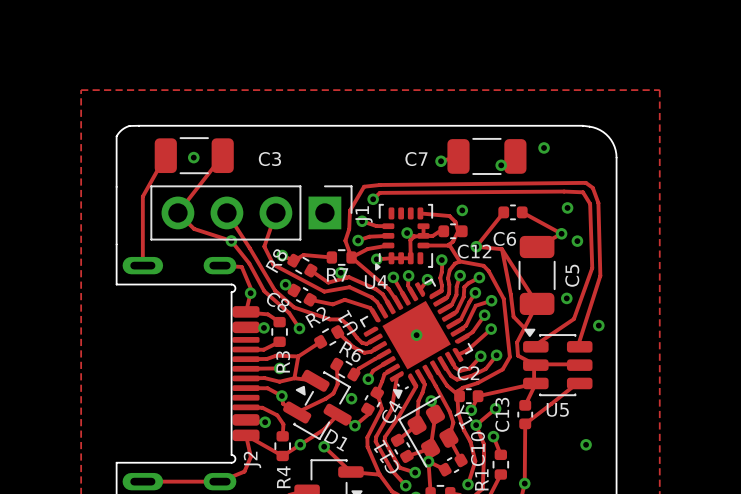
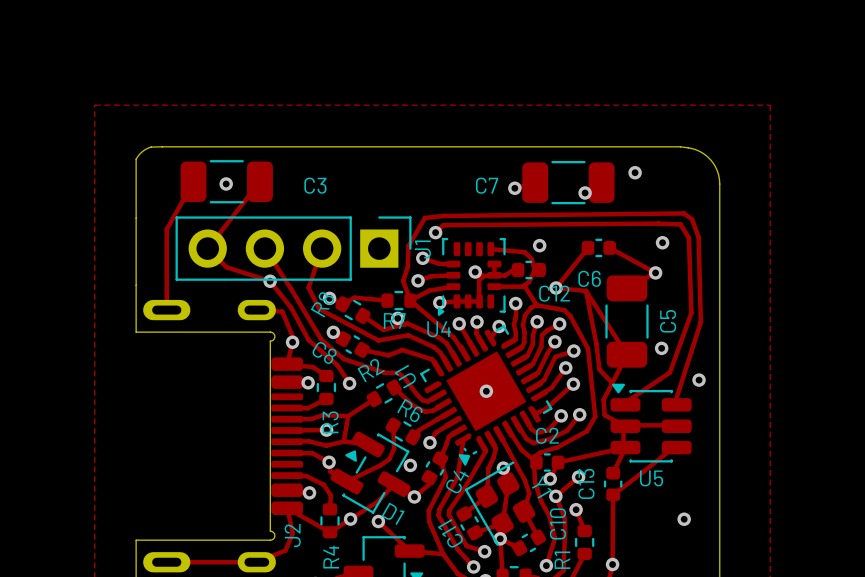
via: (577, 241) -> none

